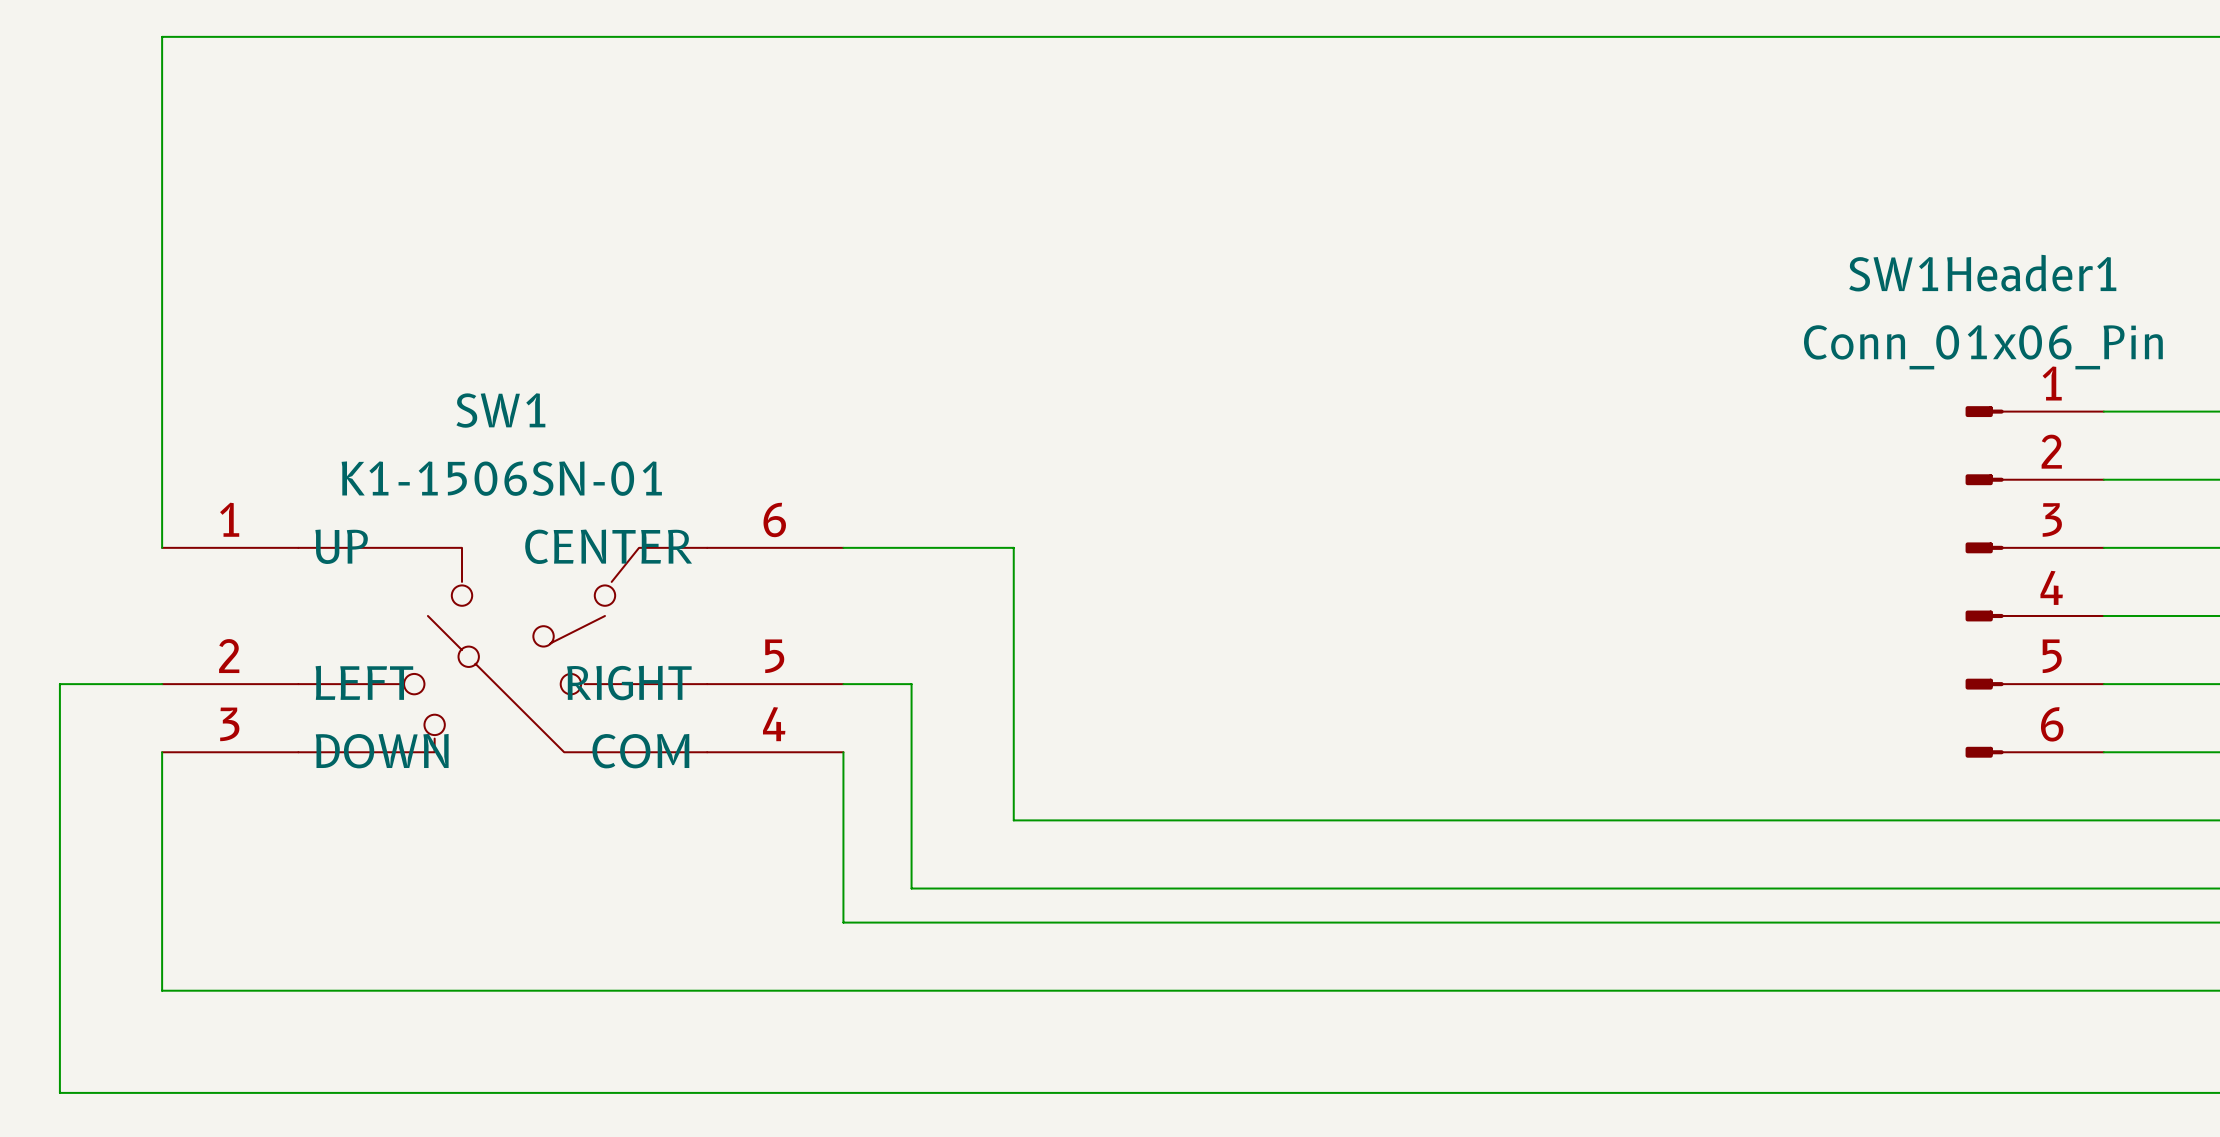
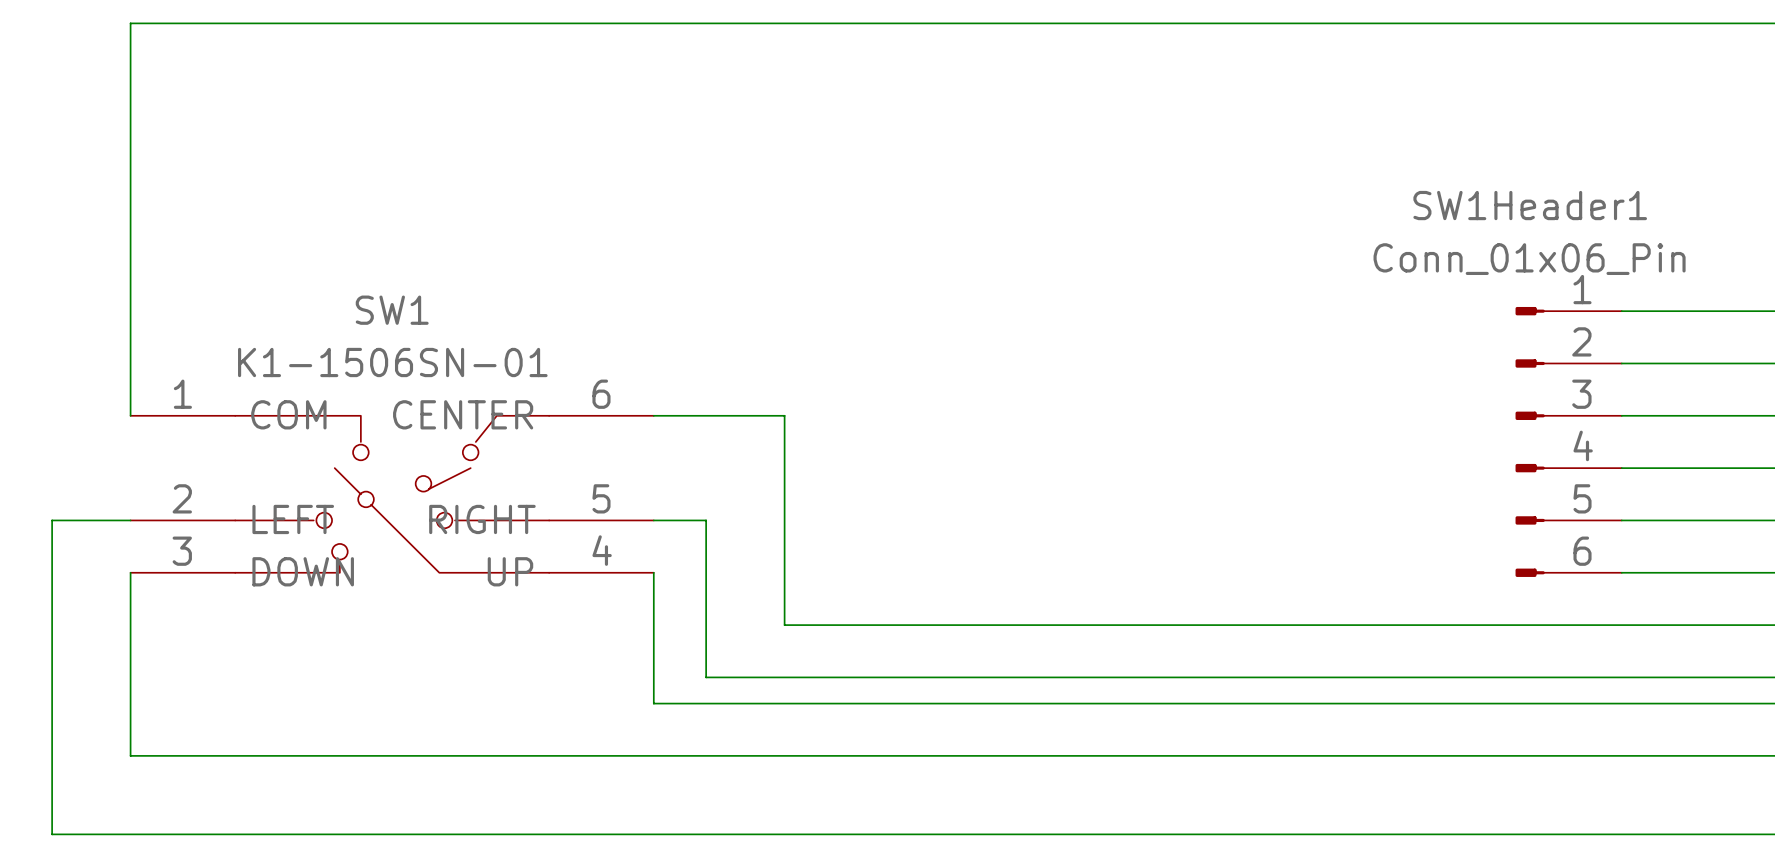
SW1 pin name: UP (341, 546) -> COM (288, 414)
SW1 pin name: COM (640, 751) -> UP (510, 571)

